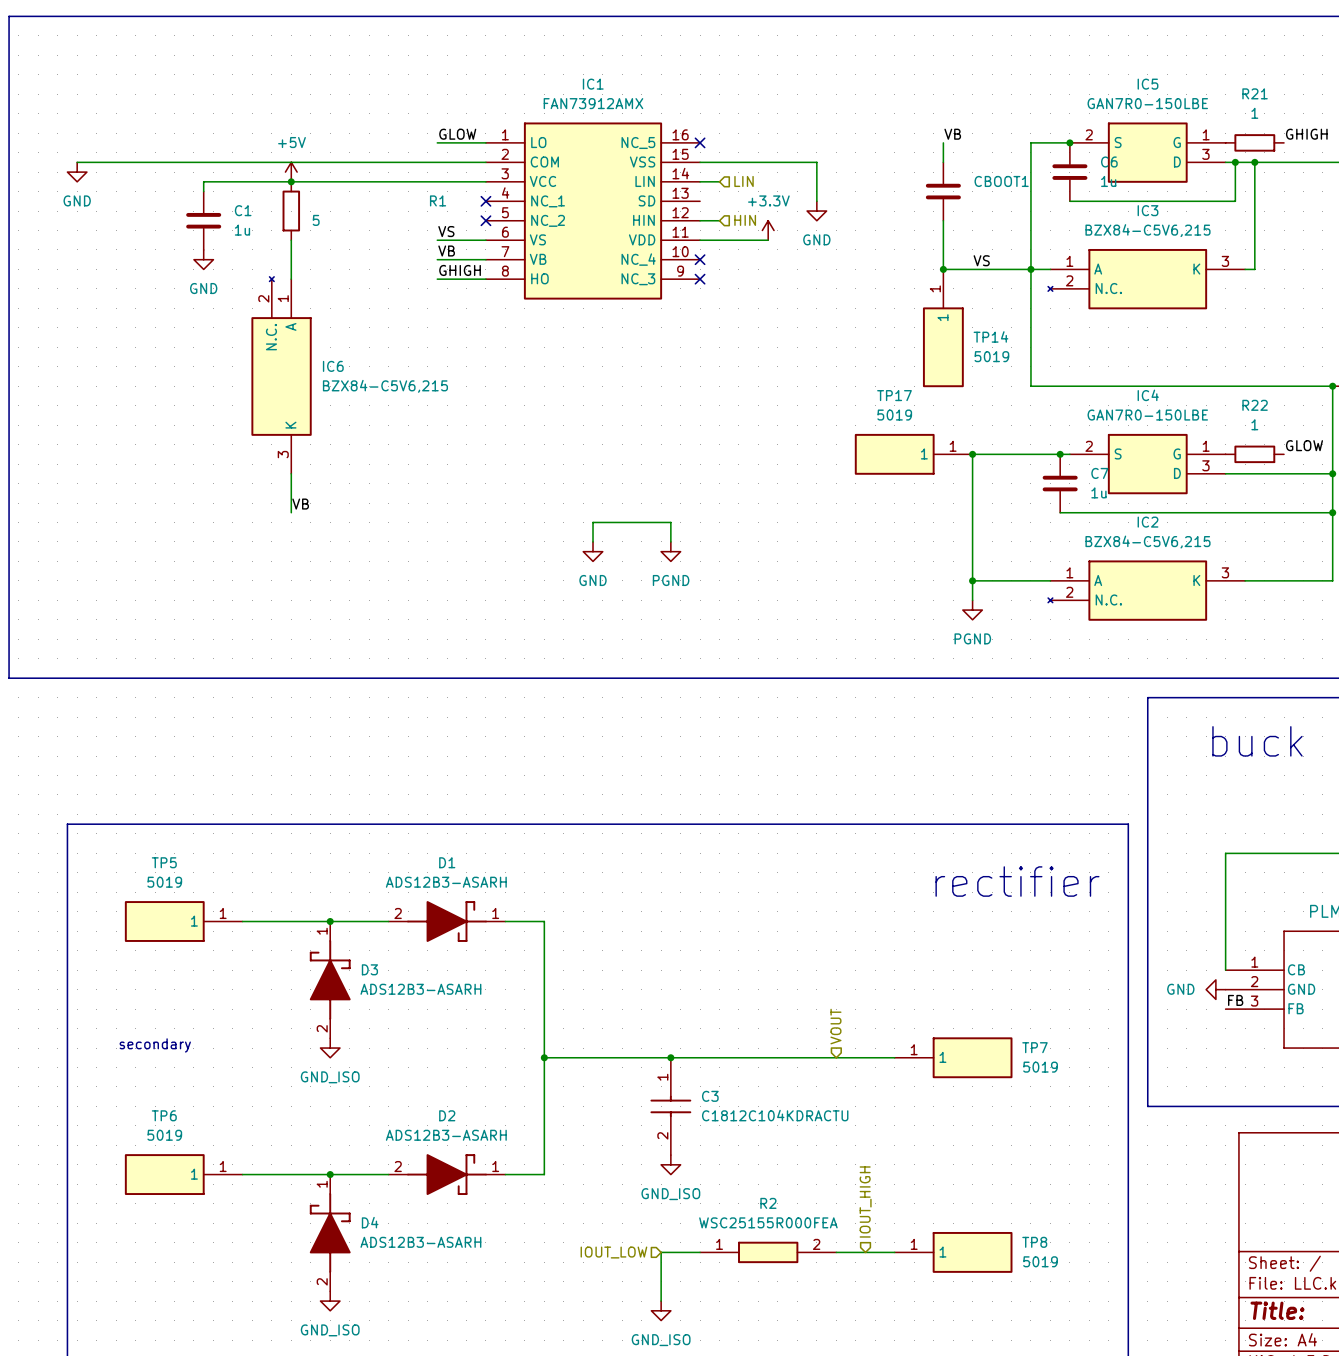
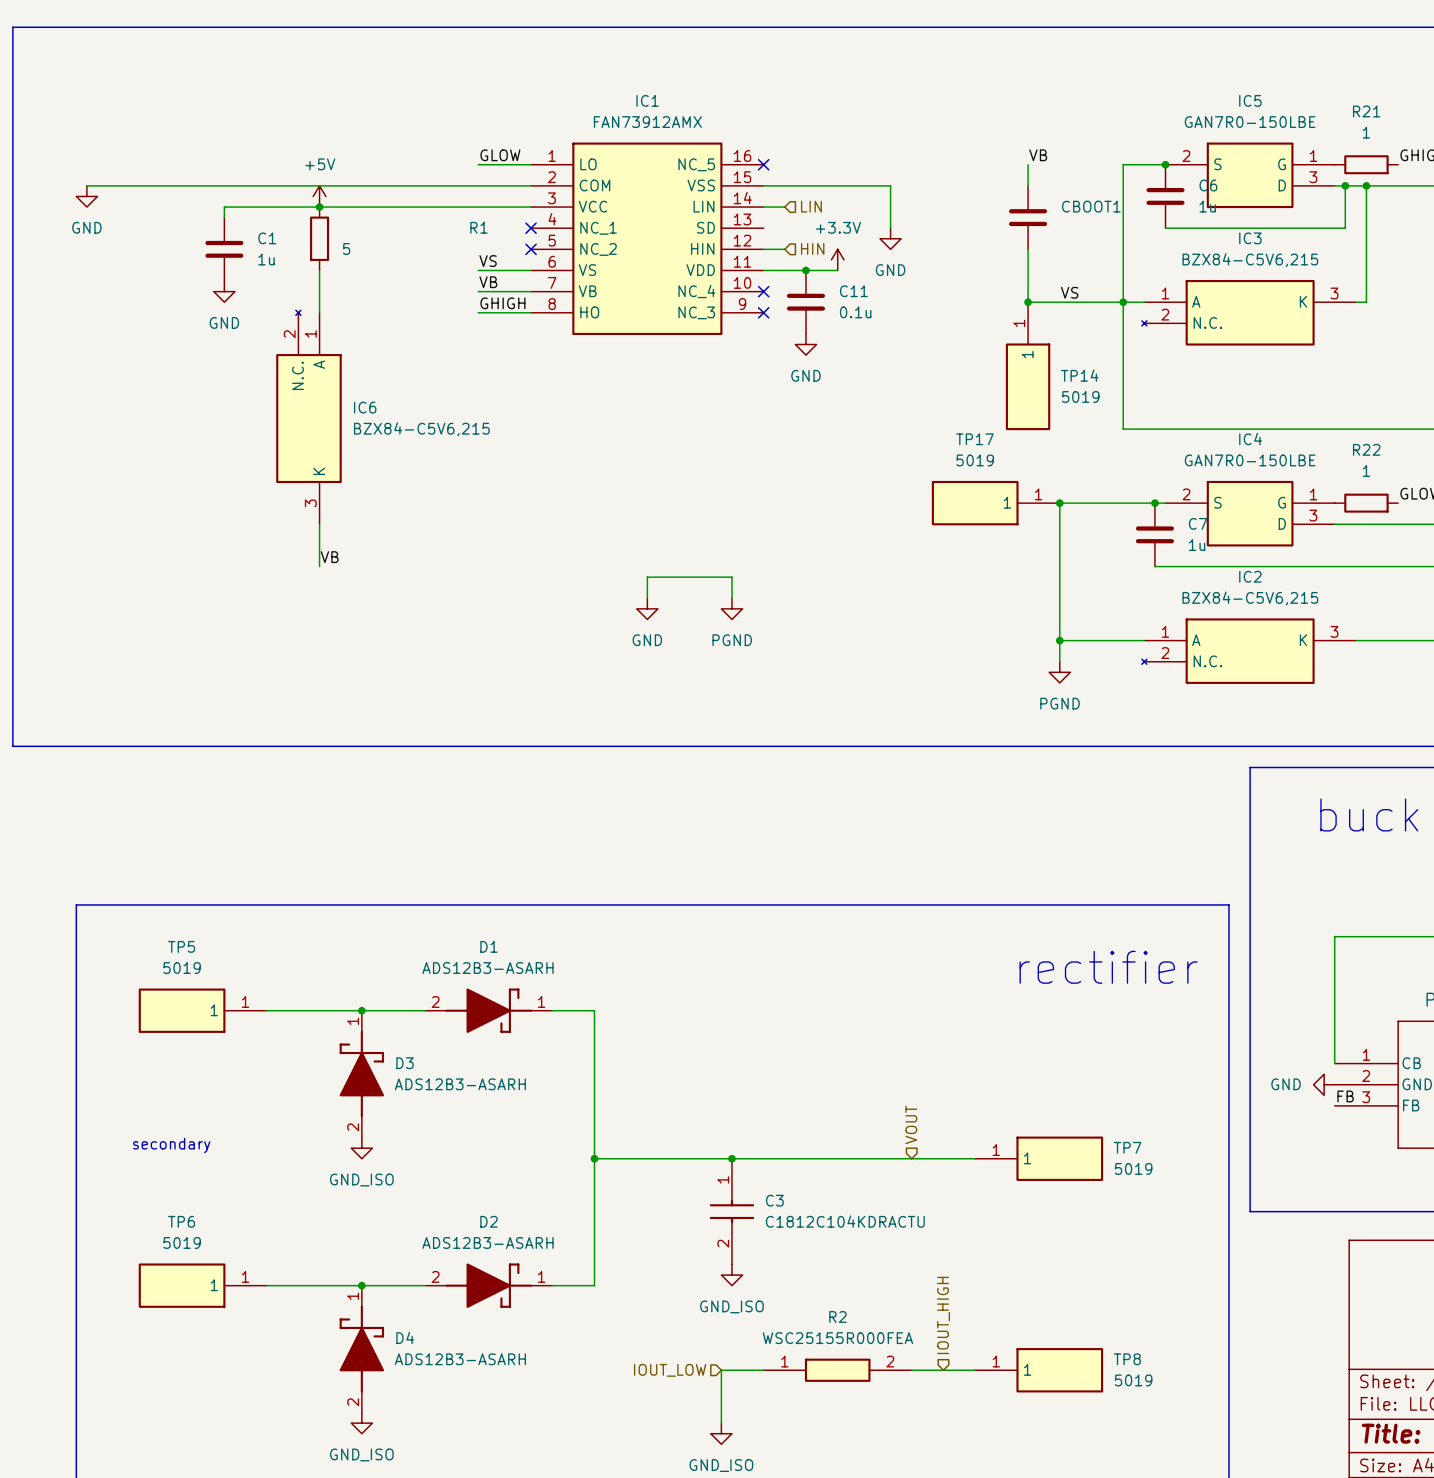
junction: none -> (805, 270)
C11: none -> 0.1u (805, 302)
power symbol: none -> GND (805, 344)

